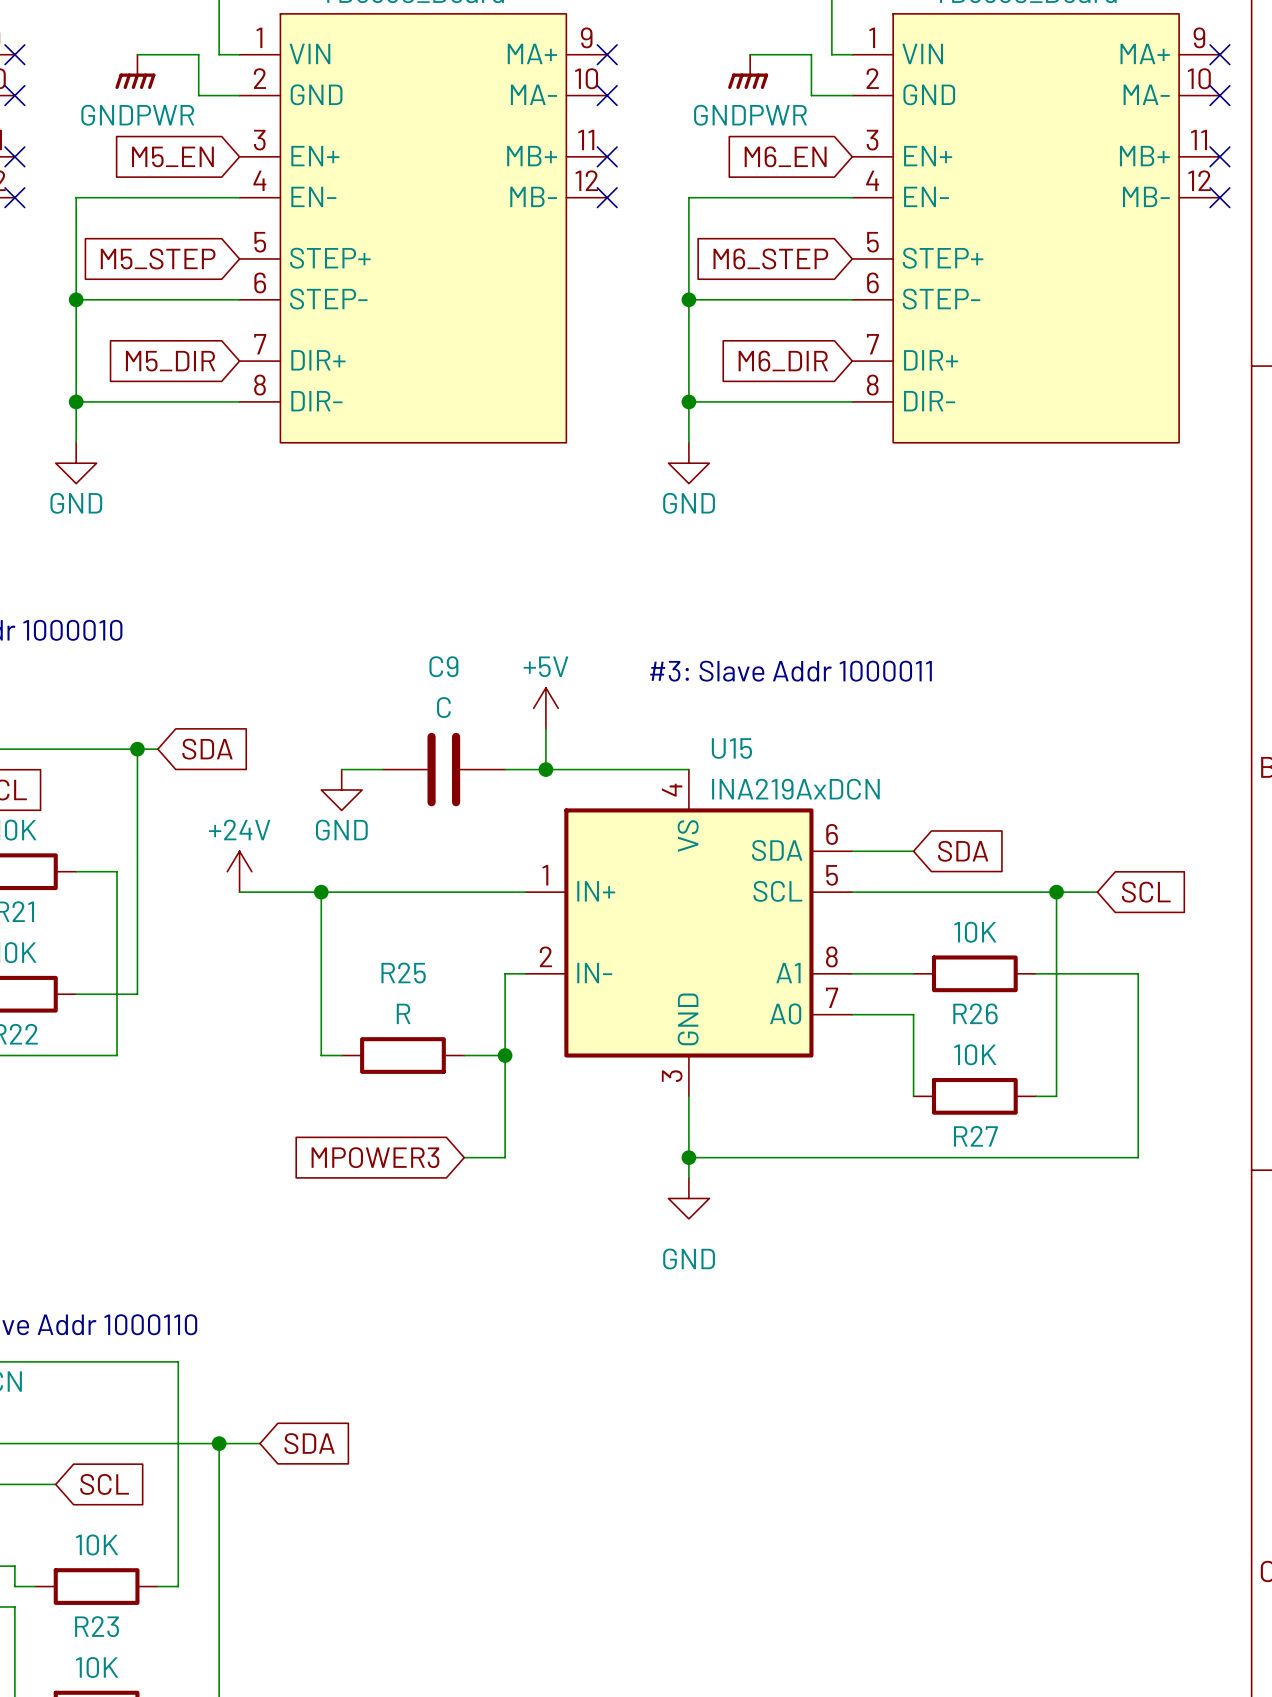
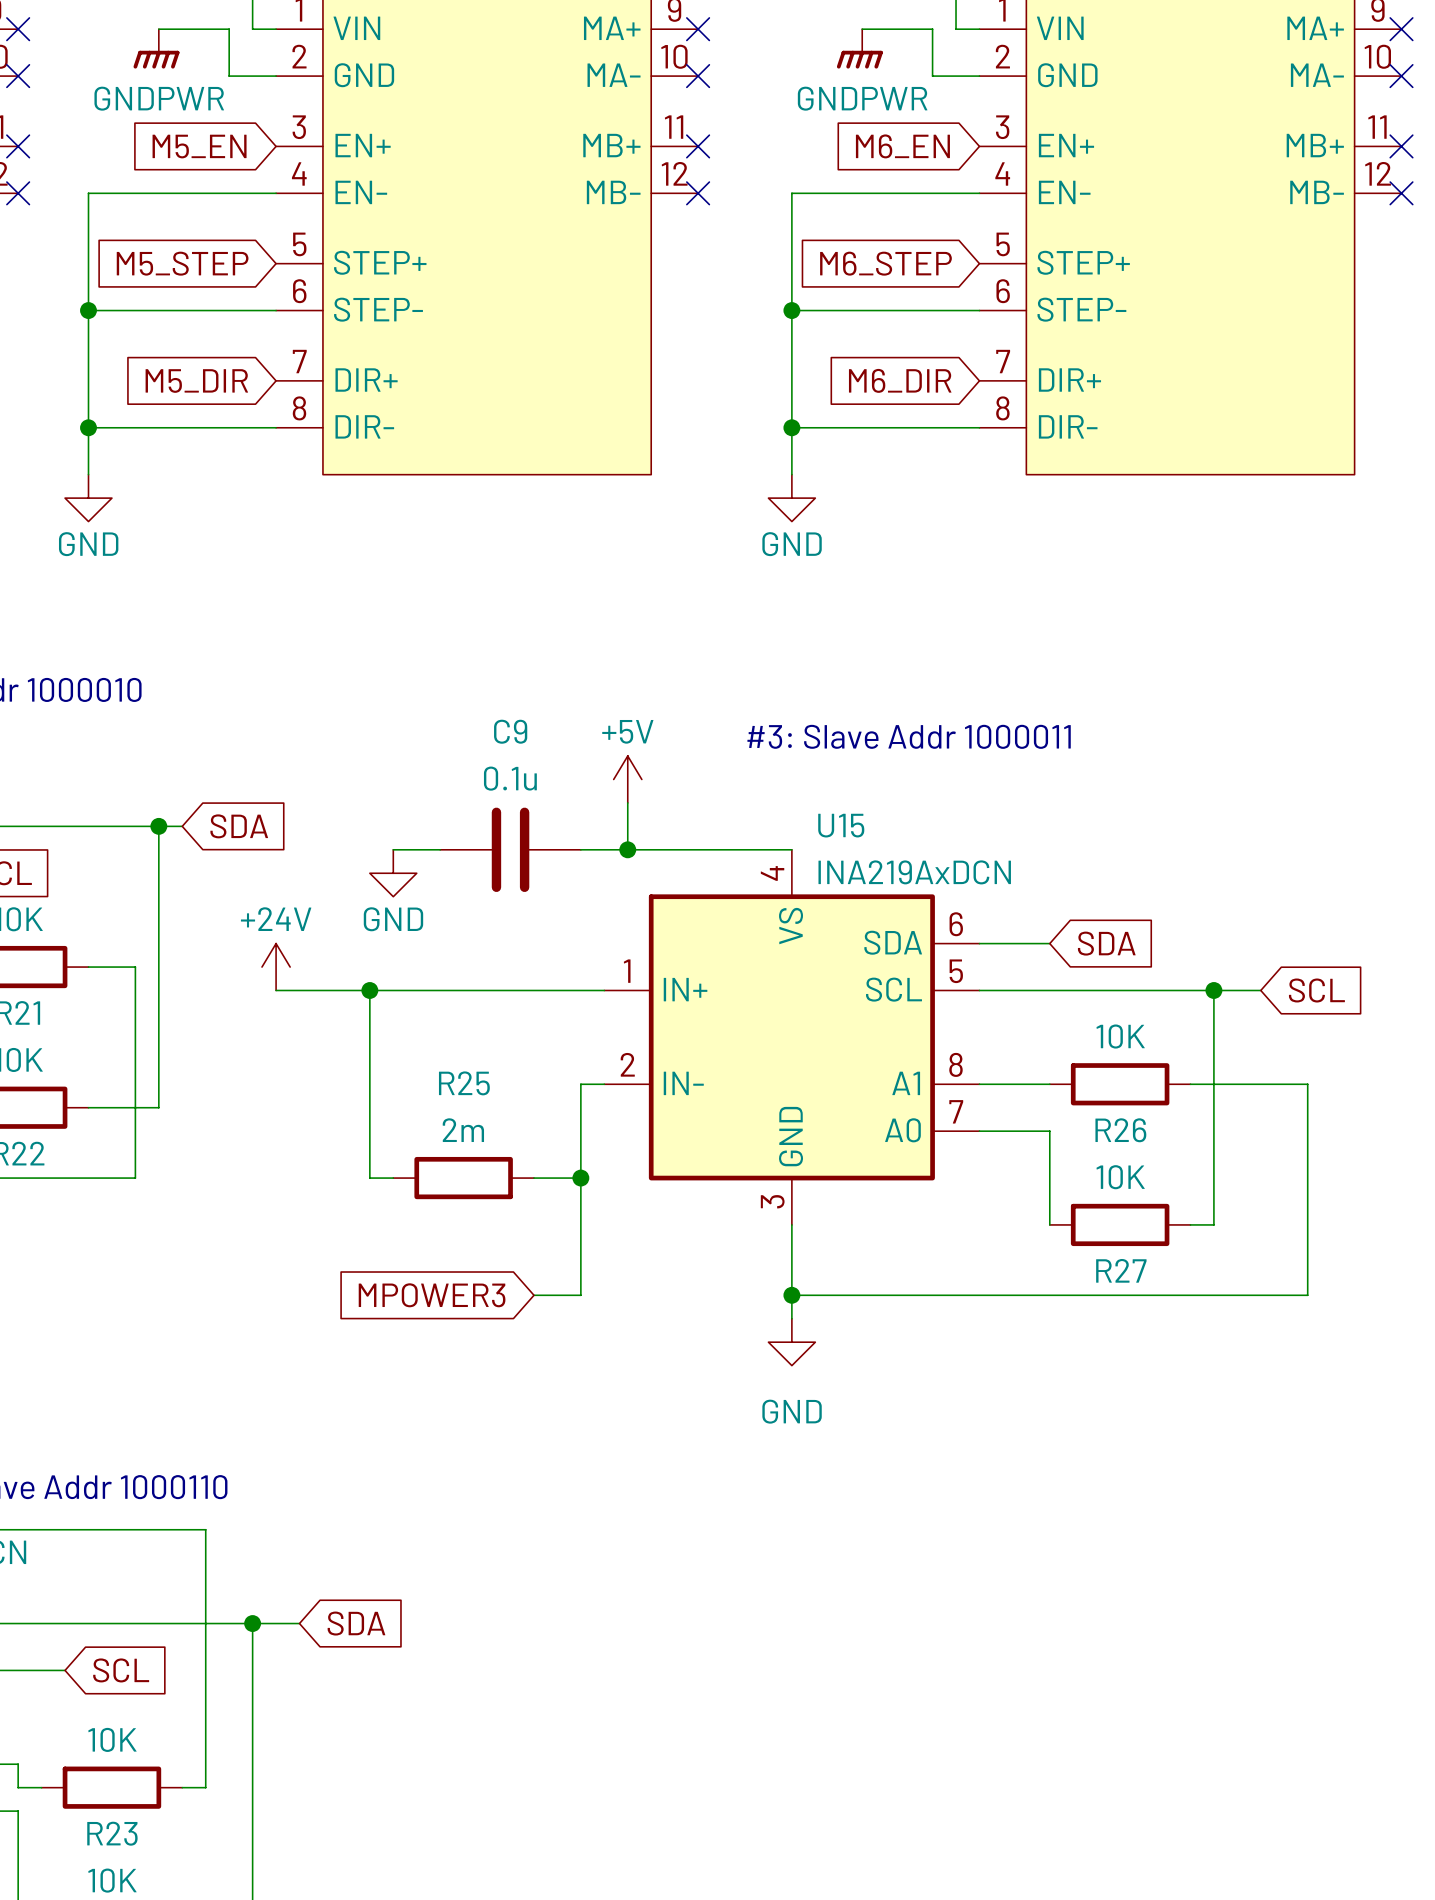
C9 value: C (443, 707) -> 0.1u (510, 778)
R25 value: R (403, 1013) -> 2m (463, 1130)

